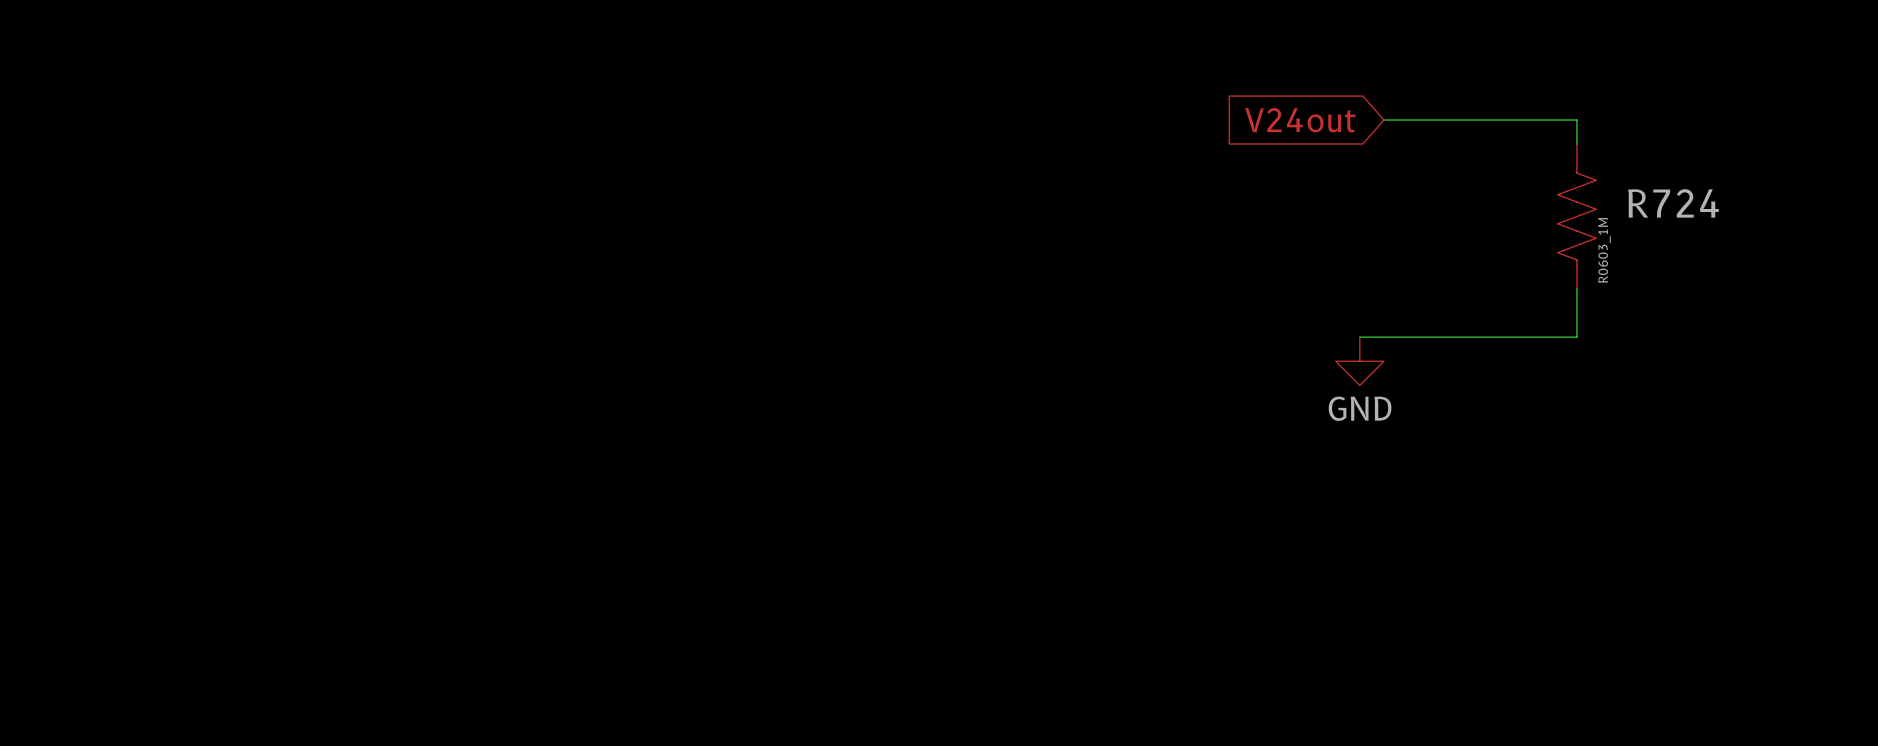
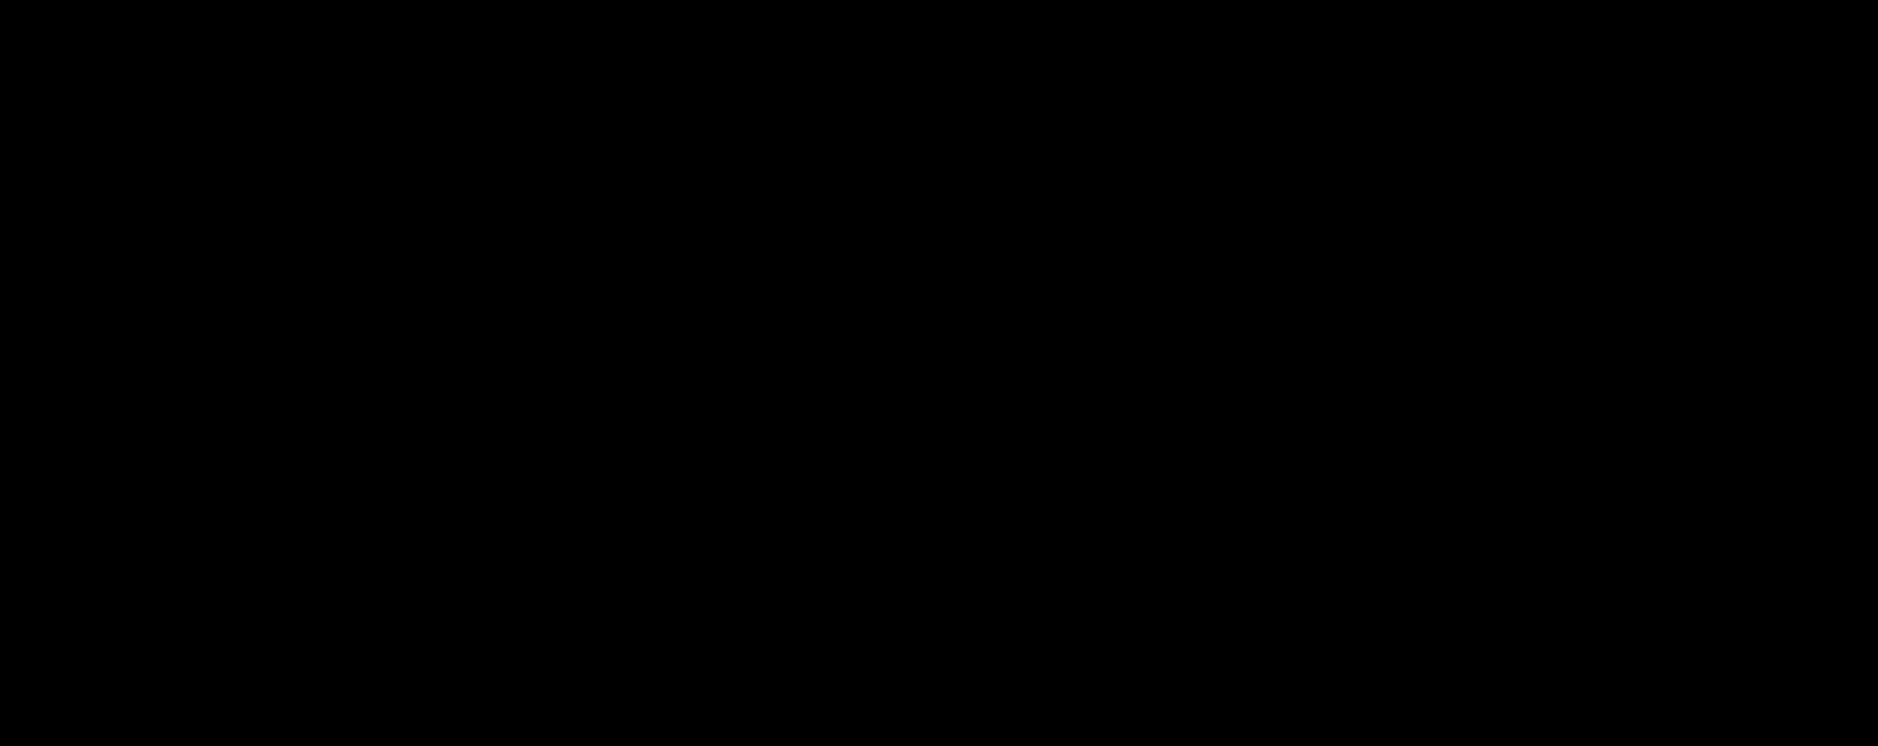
global label: V24out (1300, 120) -> none
wire: (1383, 120) (1576, 120) (1576, 144) -> none
R724: R0603_1M (1576, 216) -> none
wire: (1576, 288) (1576, 337) (1359, 337) -> none
power symbol: GND (1359, 361) -> none

